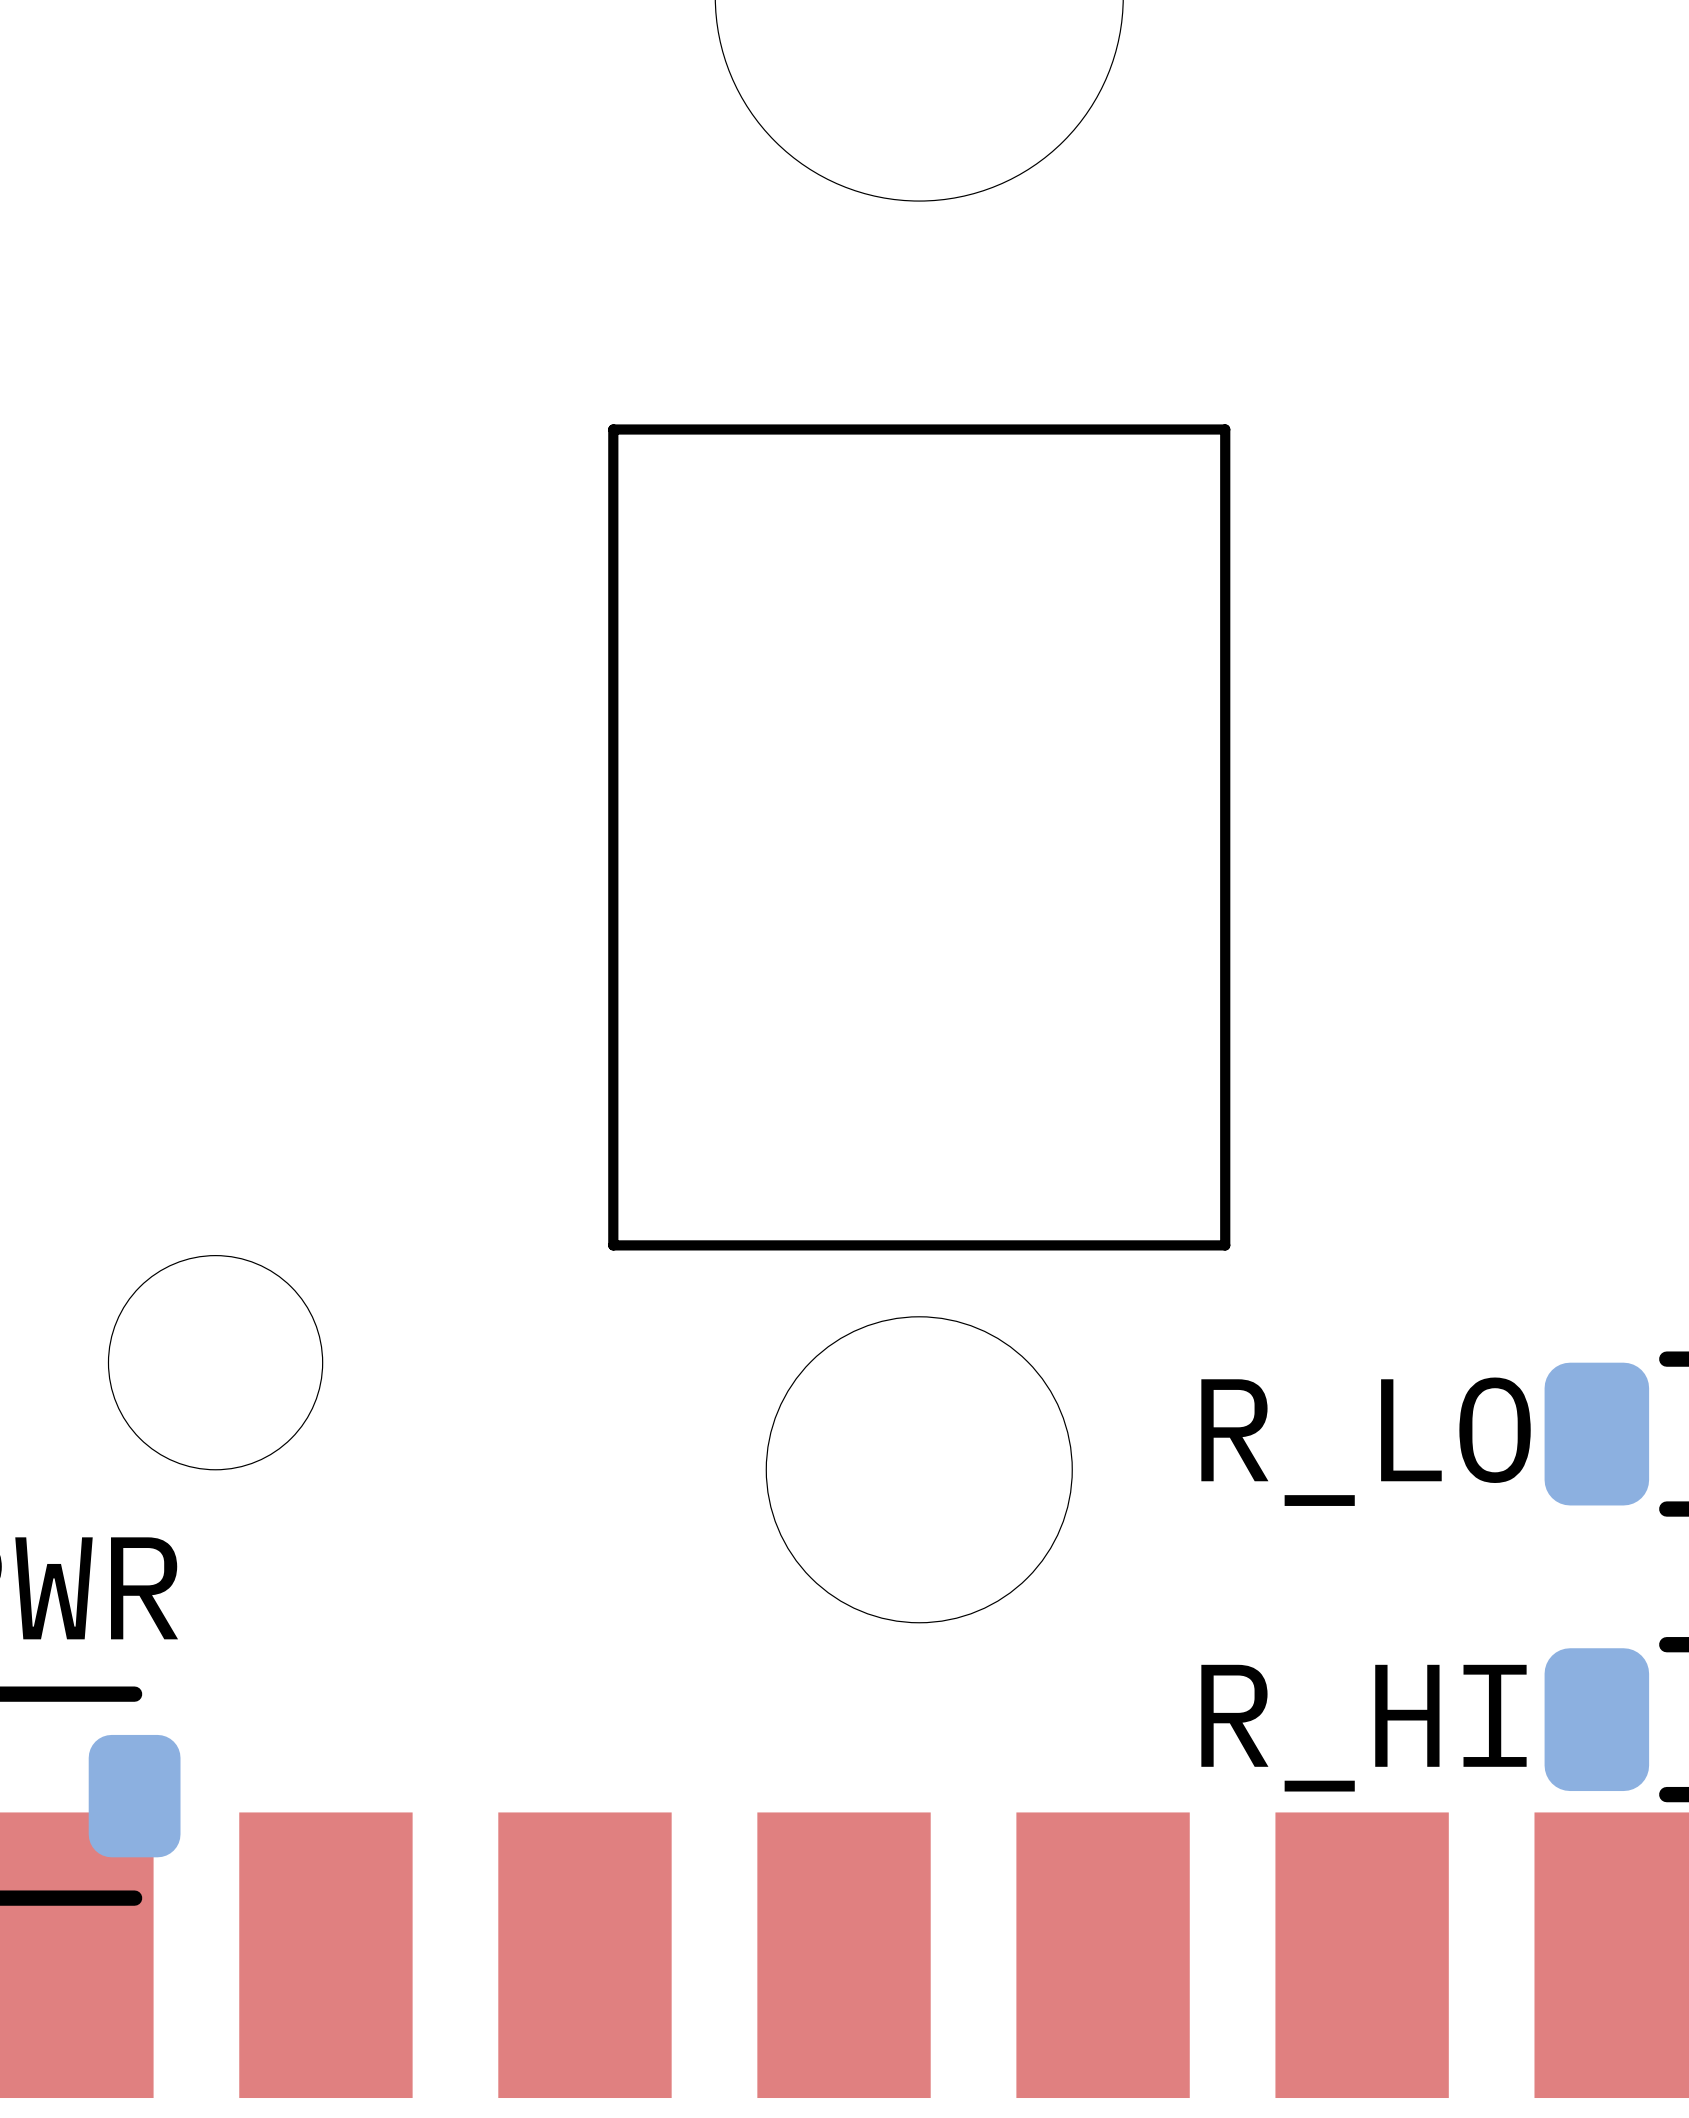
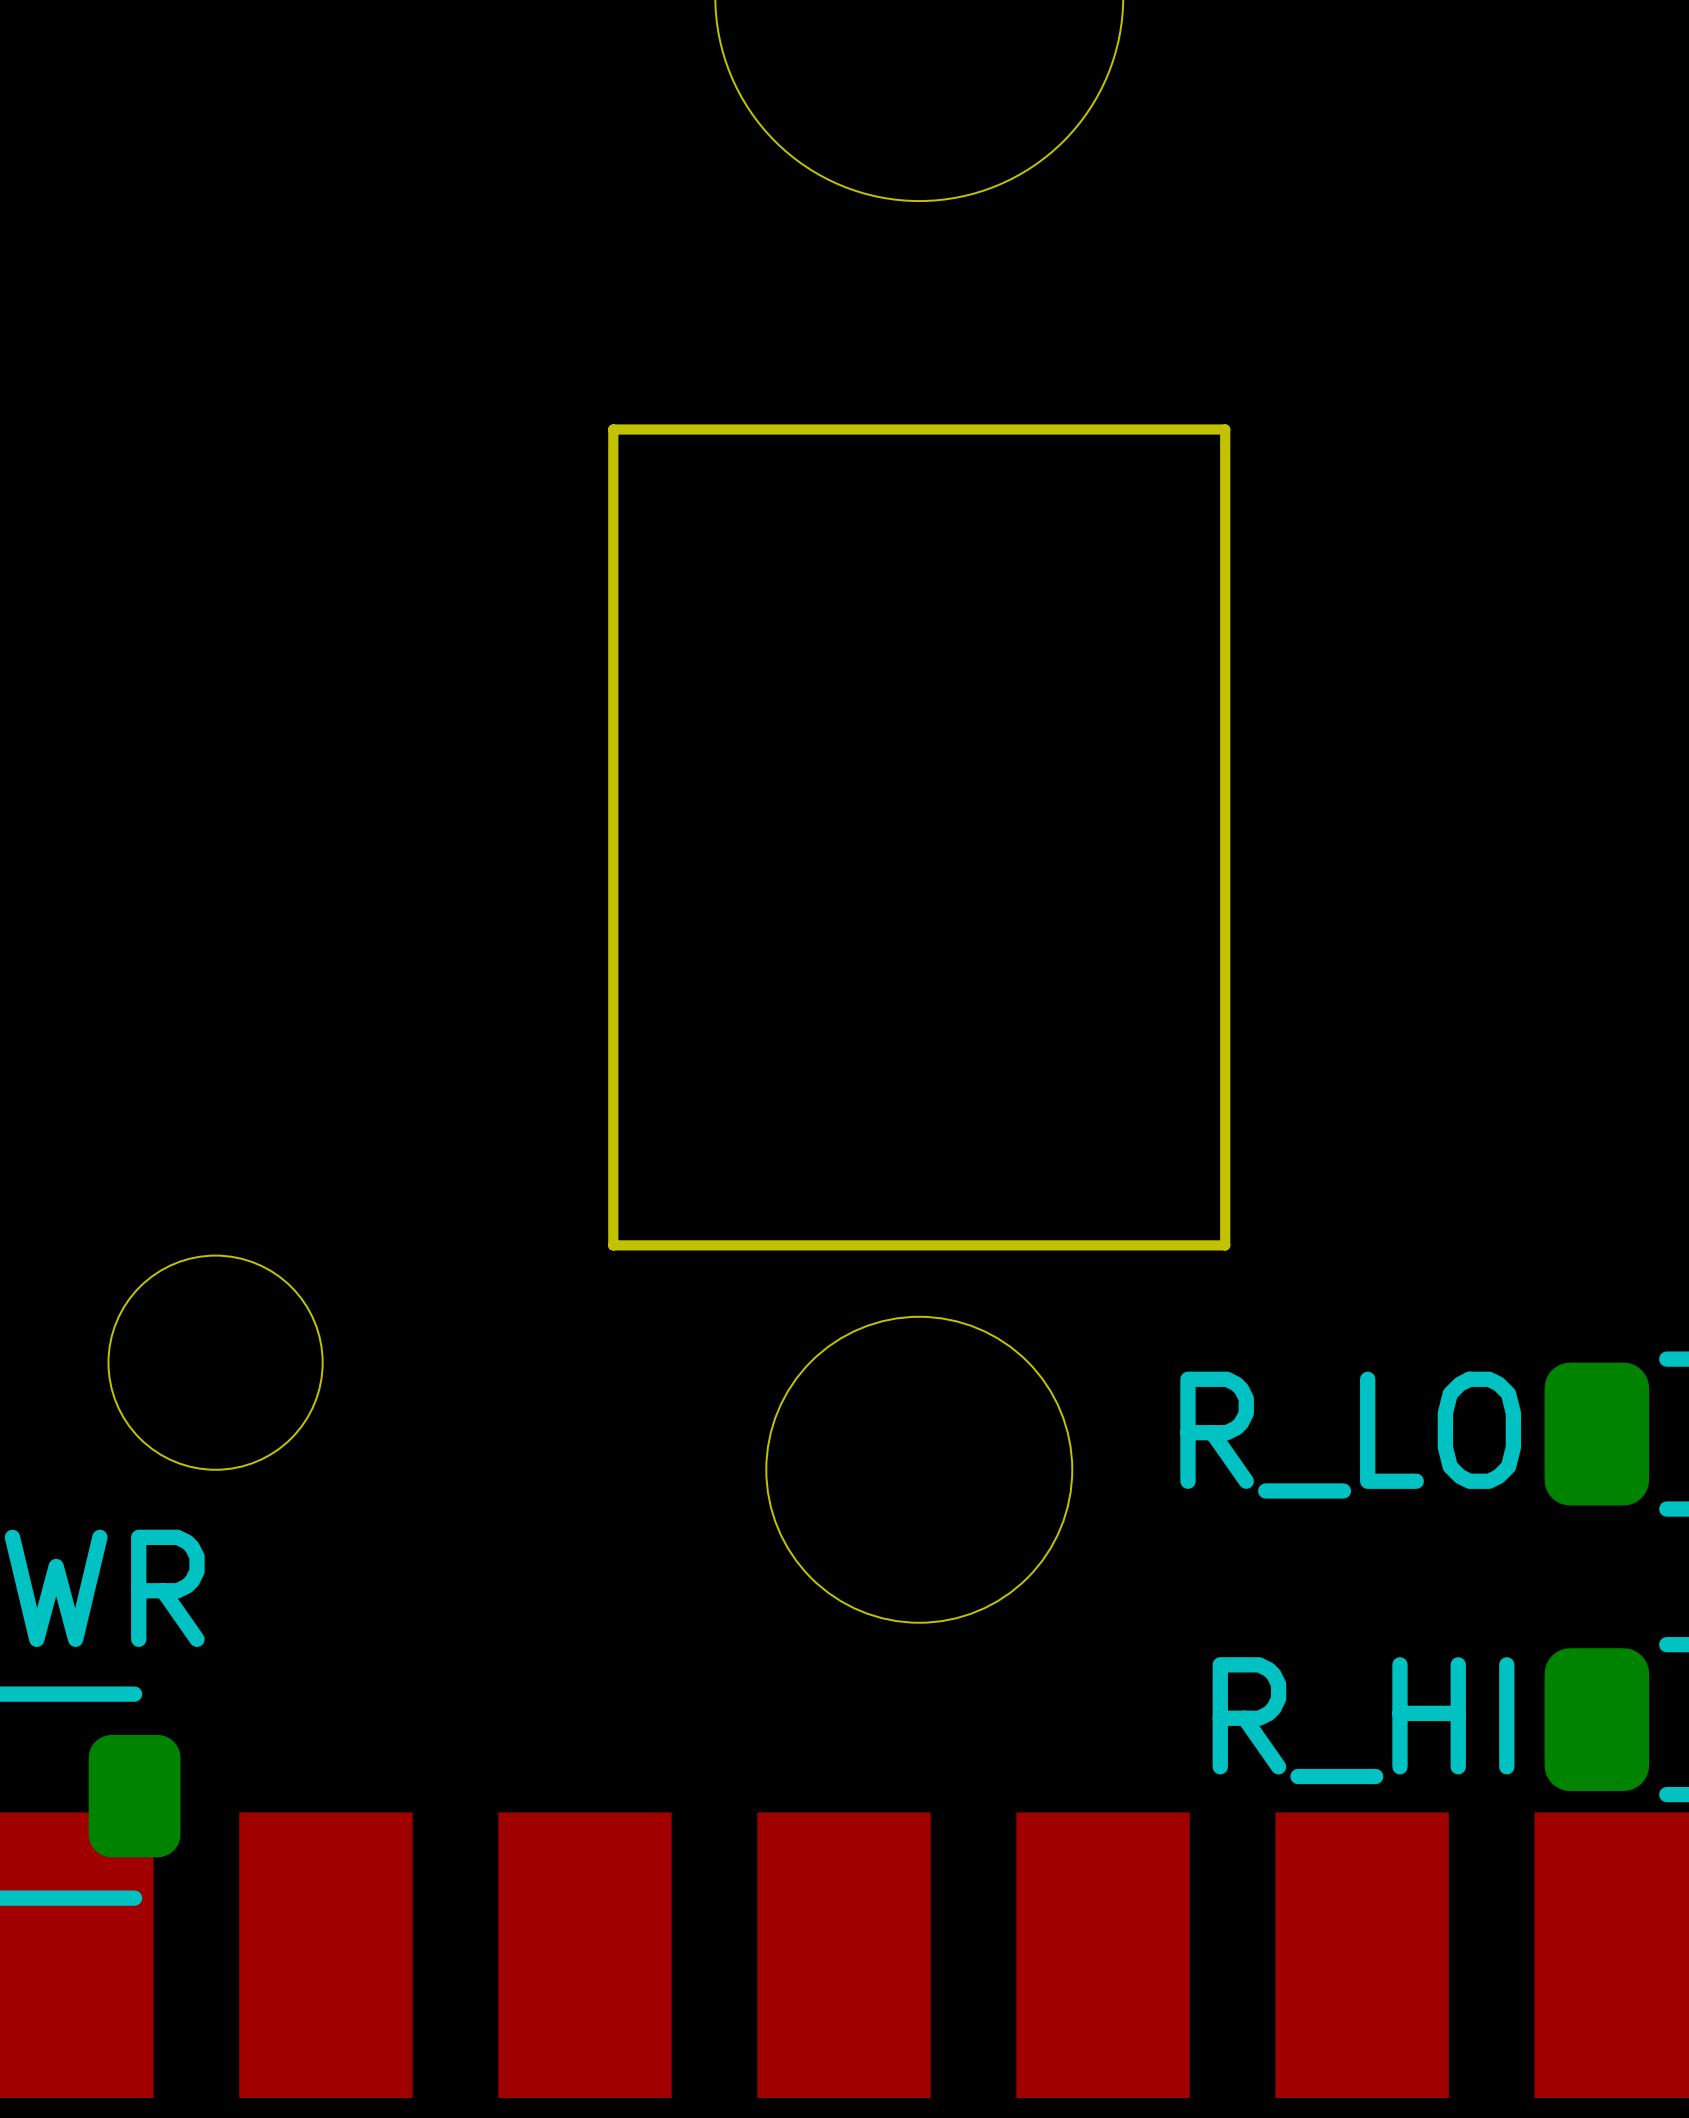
R_LO name position: R_LO (1366, 1441) -> R_LO (1350, 1435)

